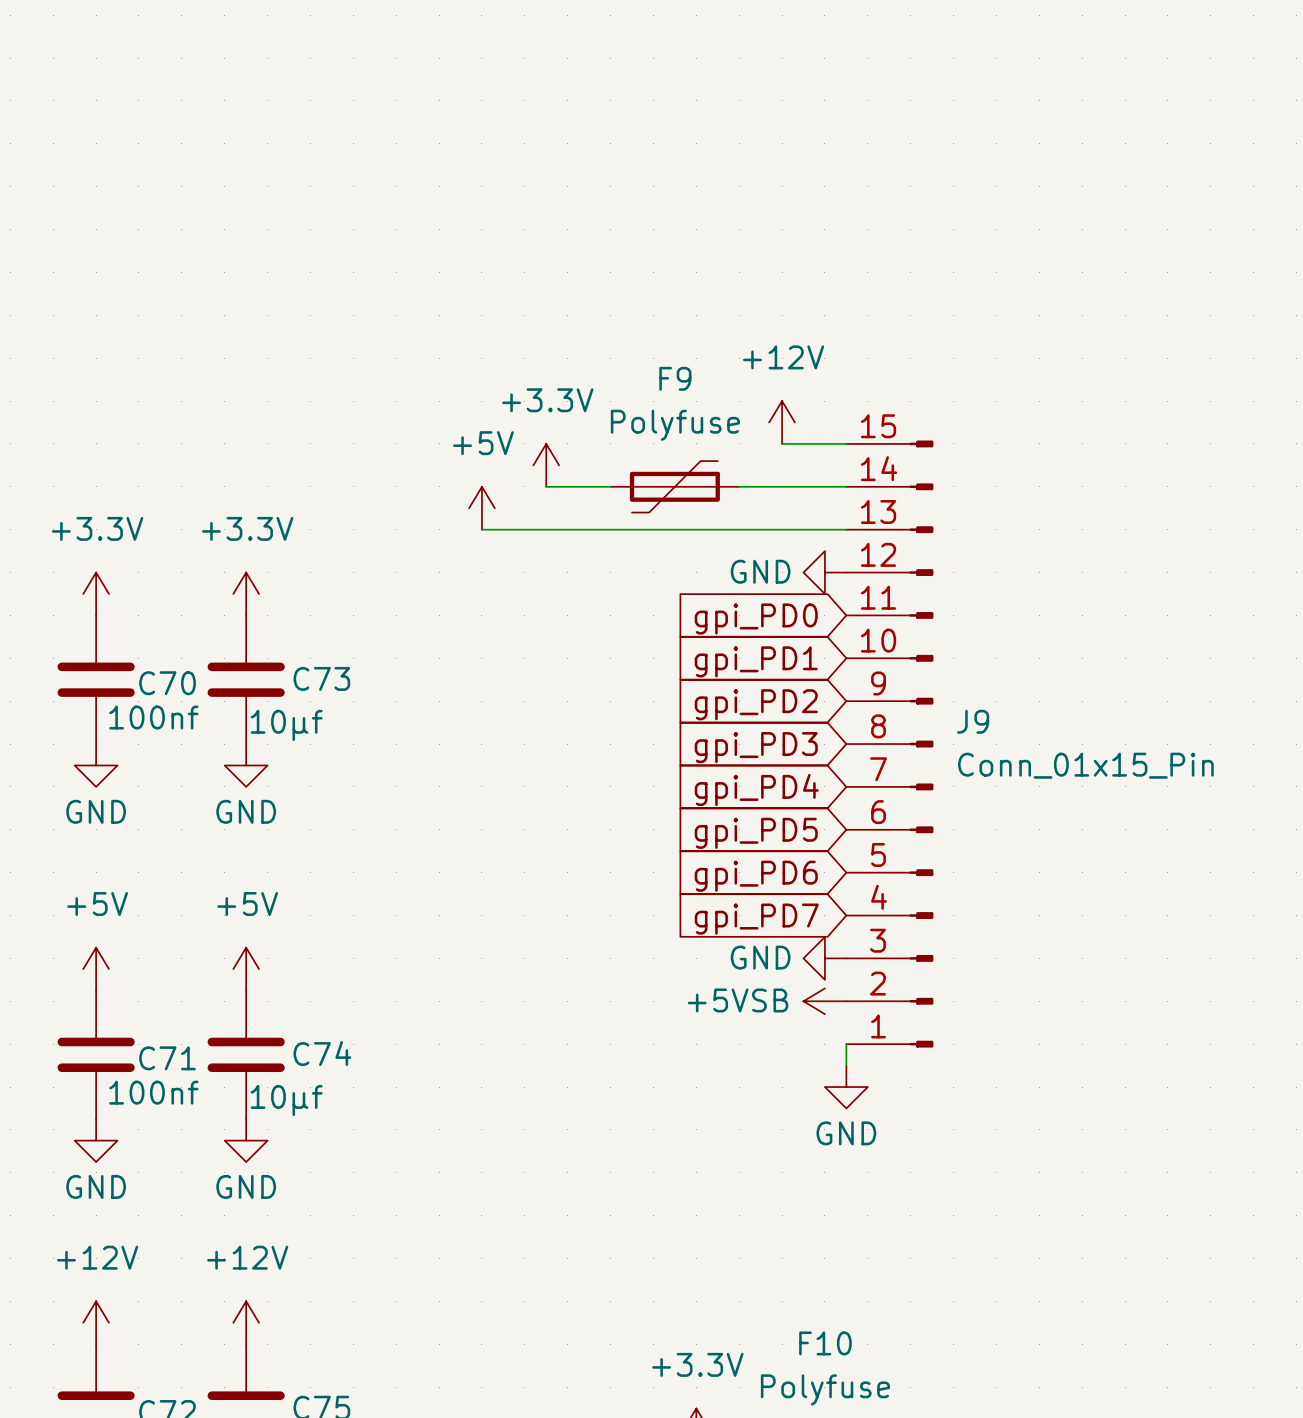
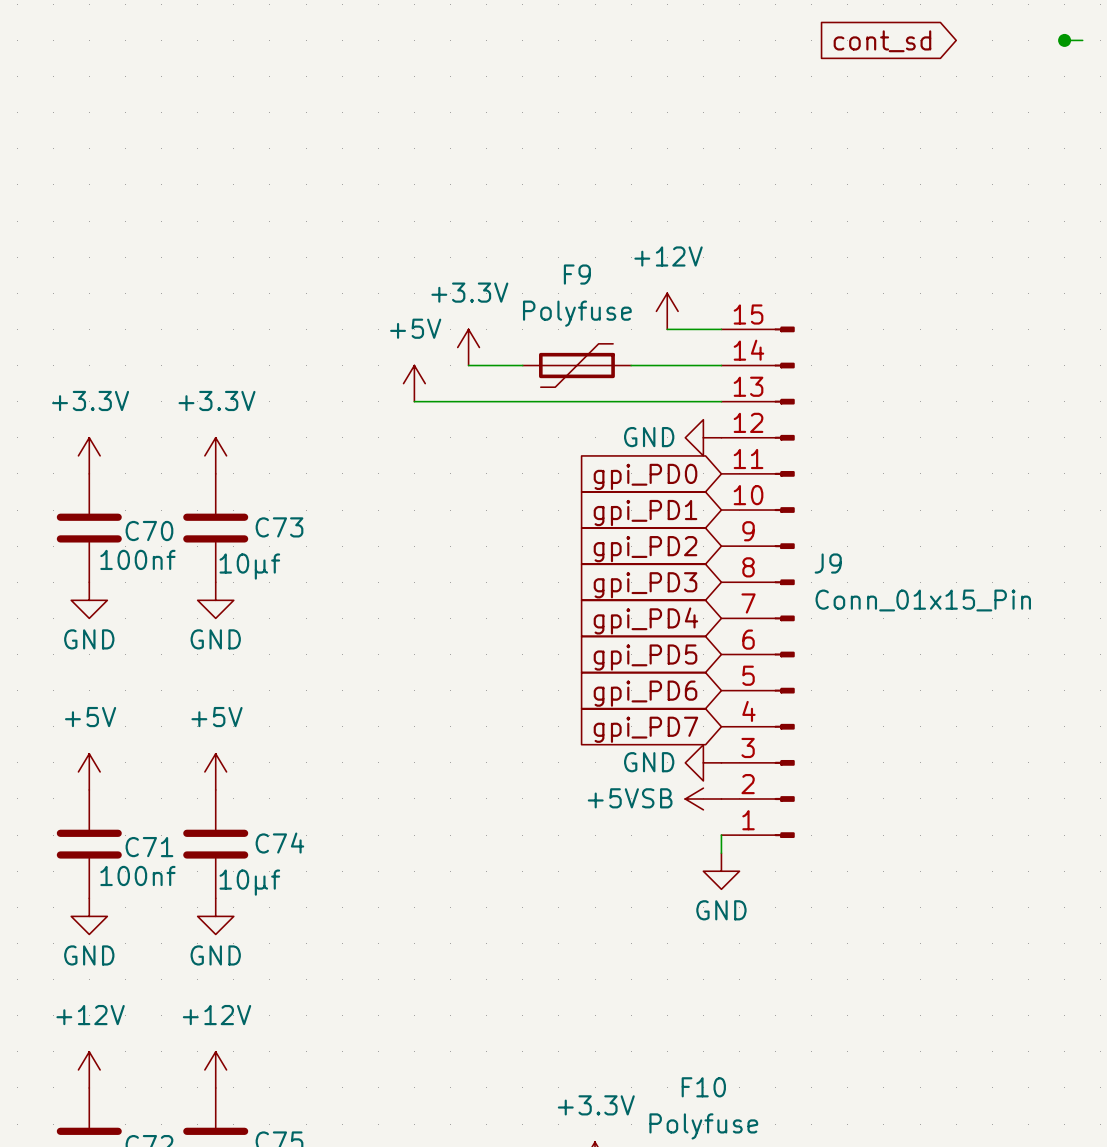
wire: none -> (1064, 40) (1082, 40)
junction: none -> (1064, 40)
global label: none -> cont_sd (882, 41)

